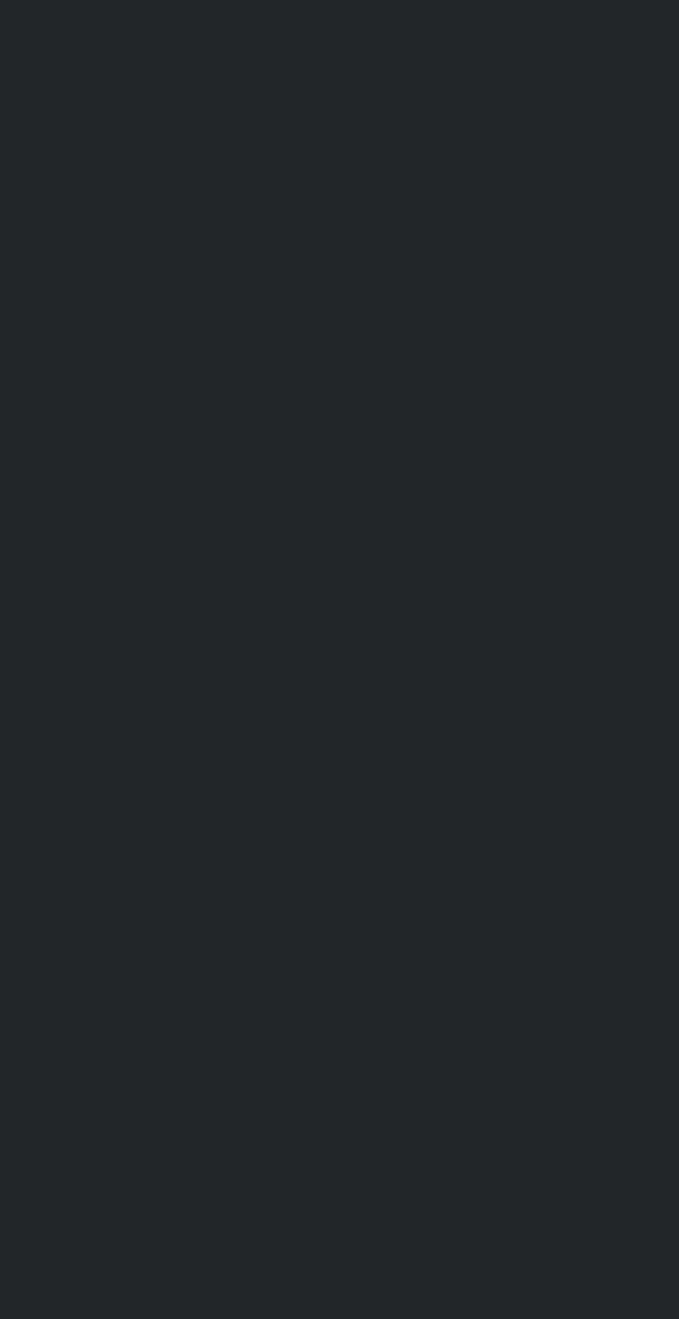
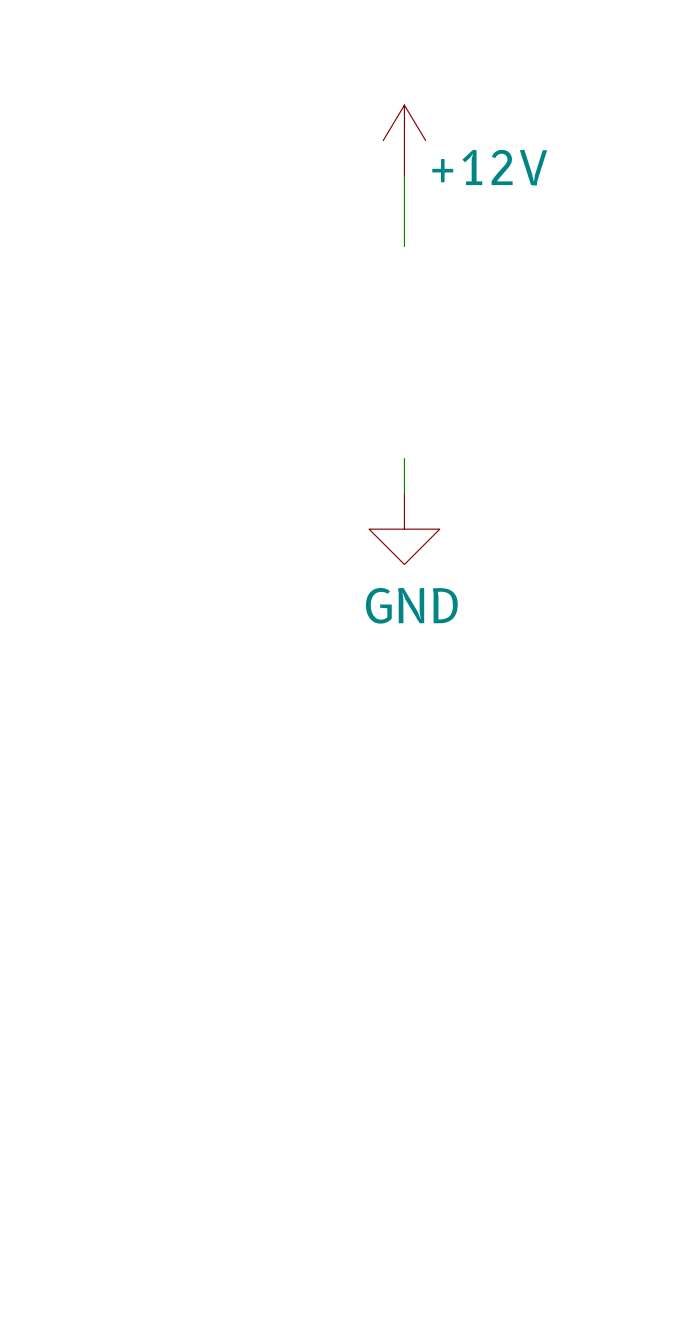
power symbol: none -> +12V (404, 140)
wire: none -> (404, 175) (404, 246)
wire: none -> (404, 458) (404, 493)
power symbol: none -> GND (404, 529)

